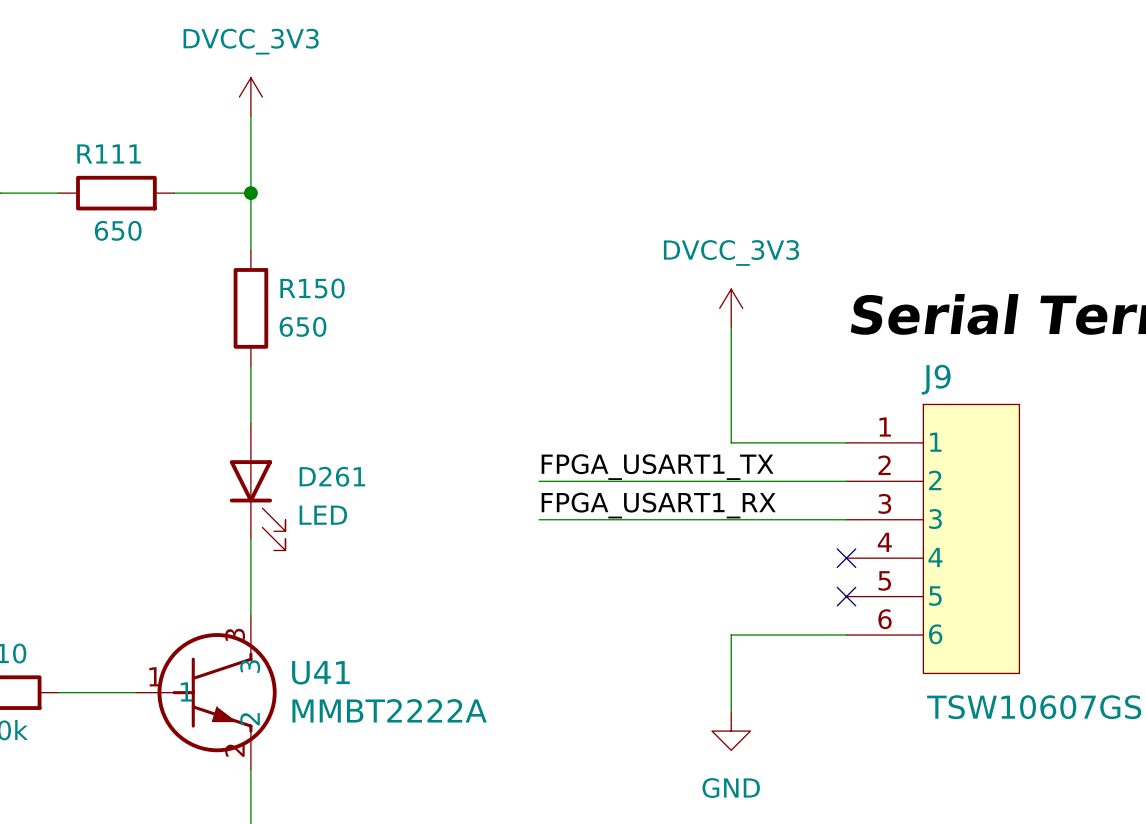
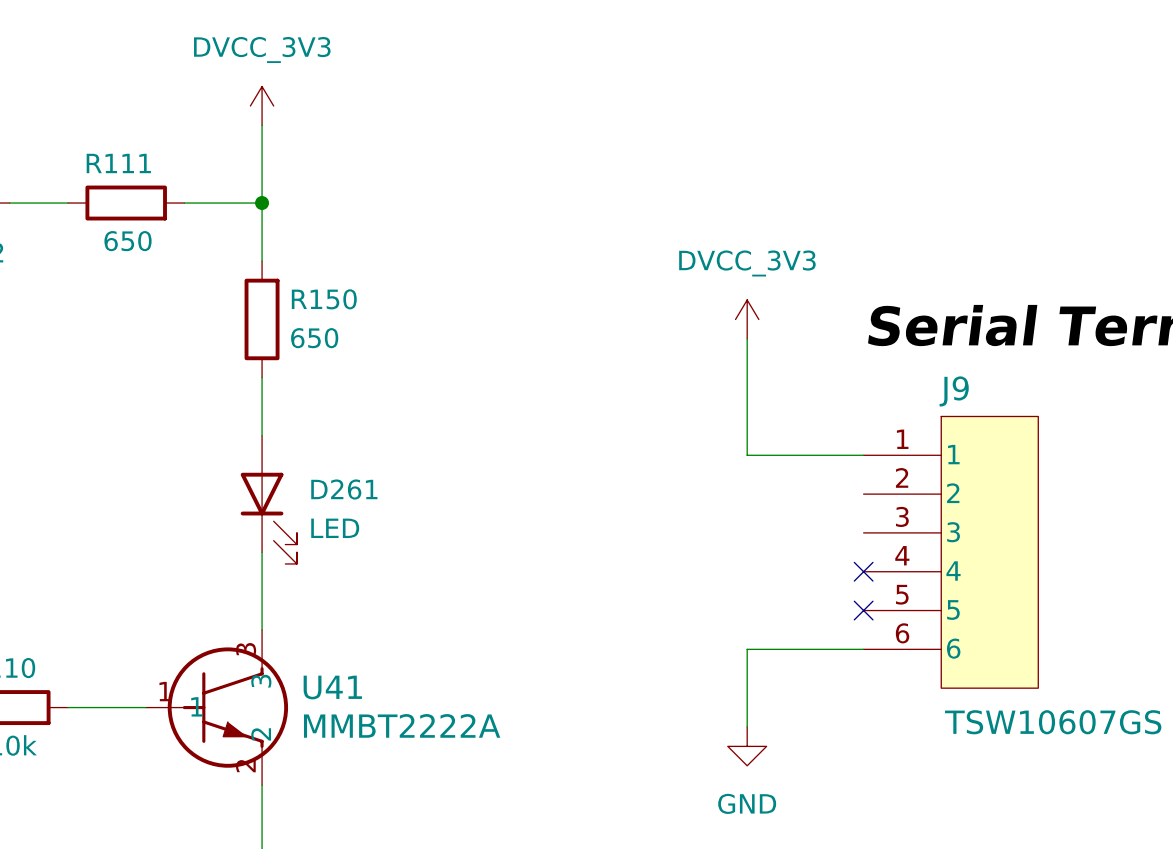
label: FPGA_USART1_TX (657, 467) -> none
wire: (539, 481) (846, 481) -> none
label: FPGA_USART1_RX (658, 505) -> none
wire: (539, 519) (846, 519) -> none

